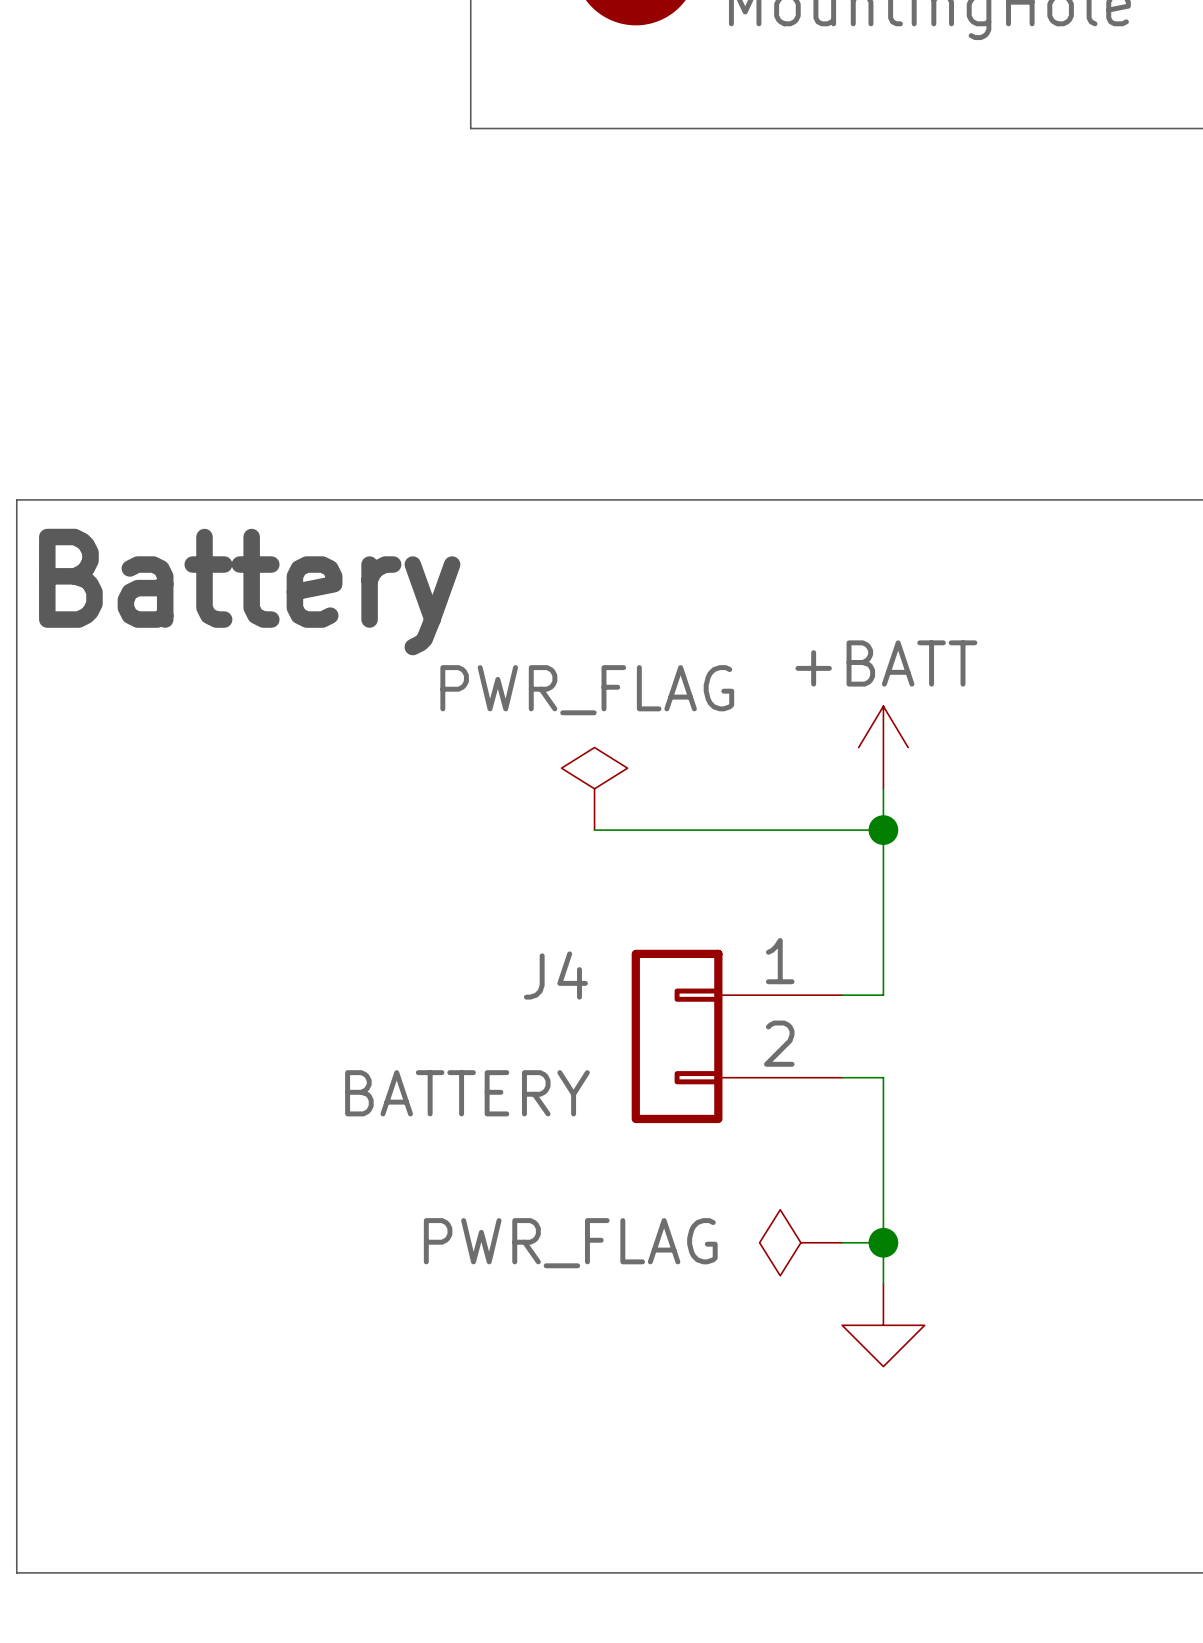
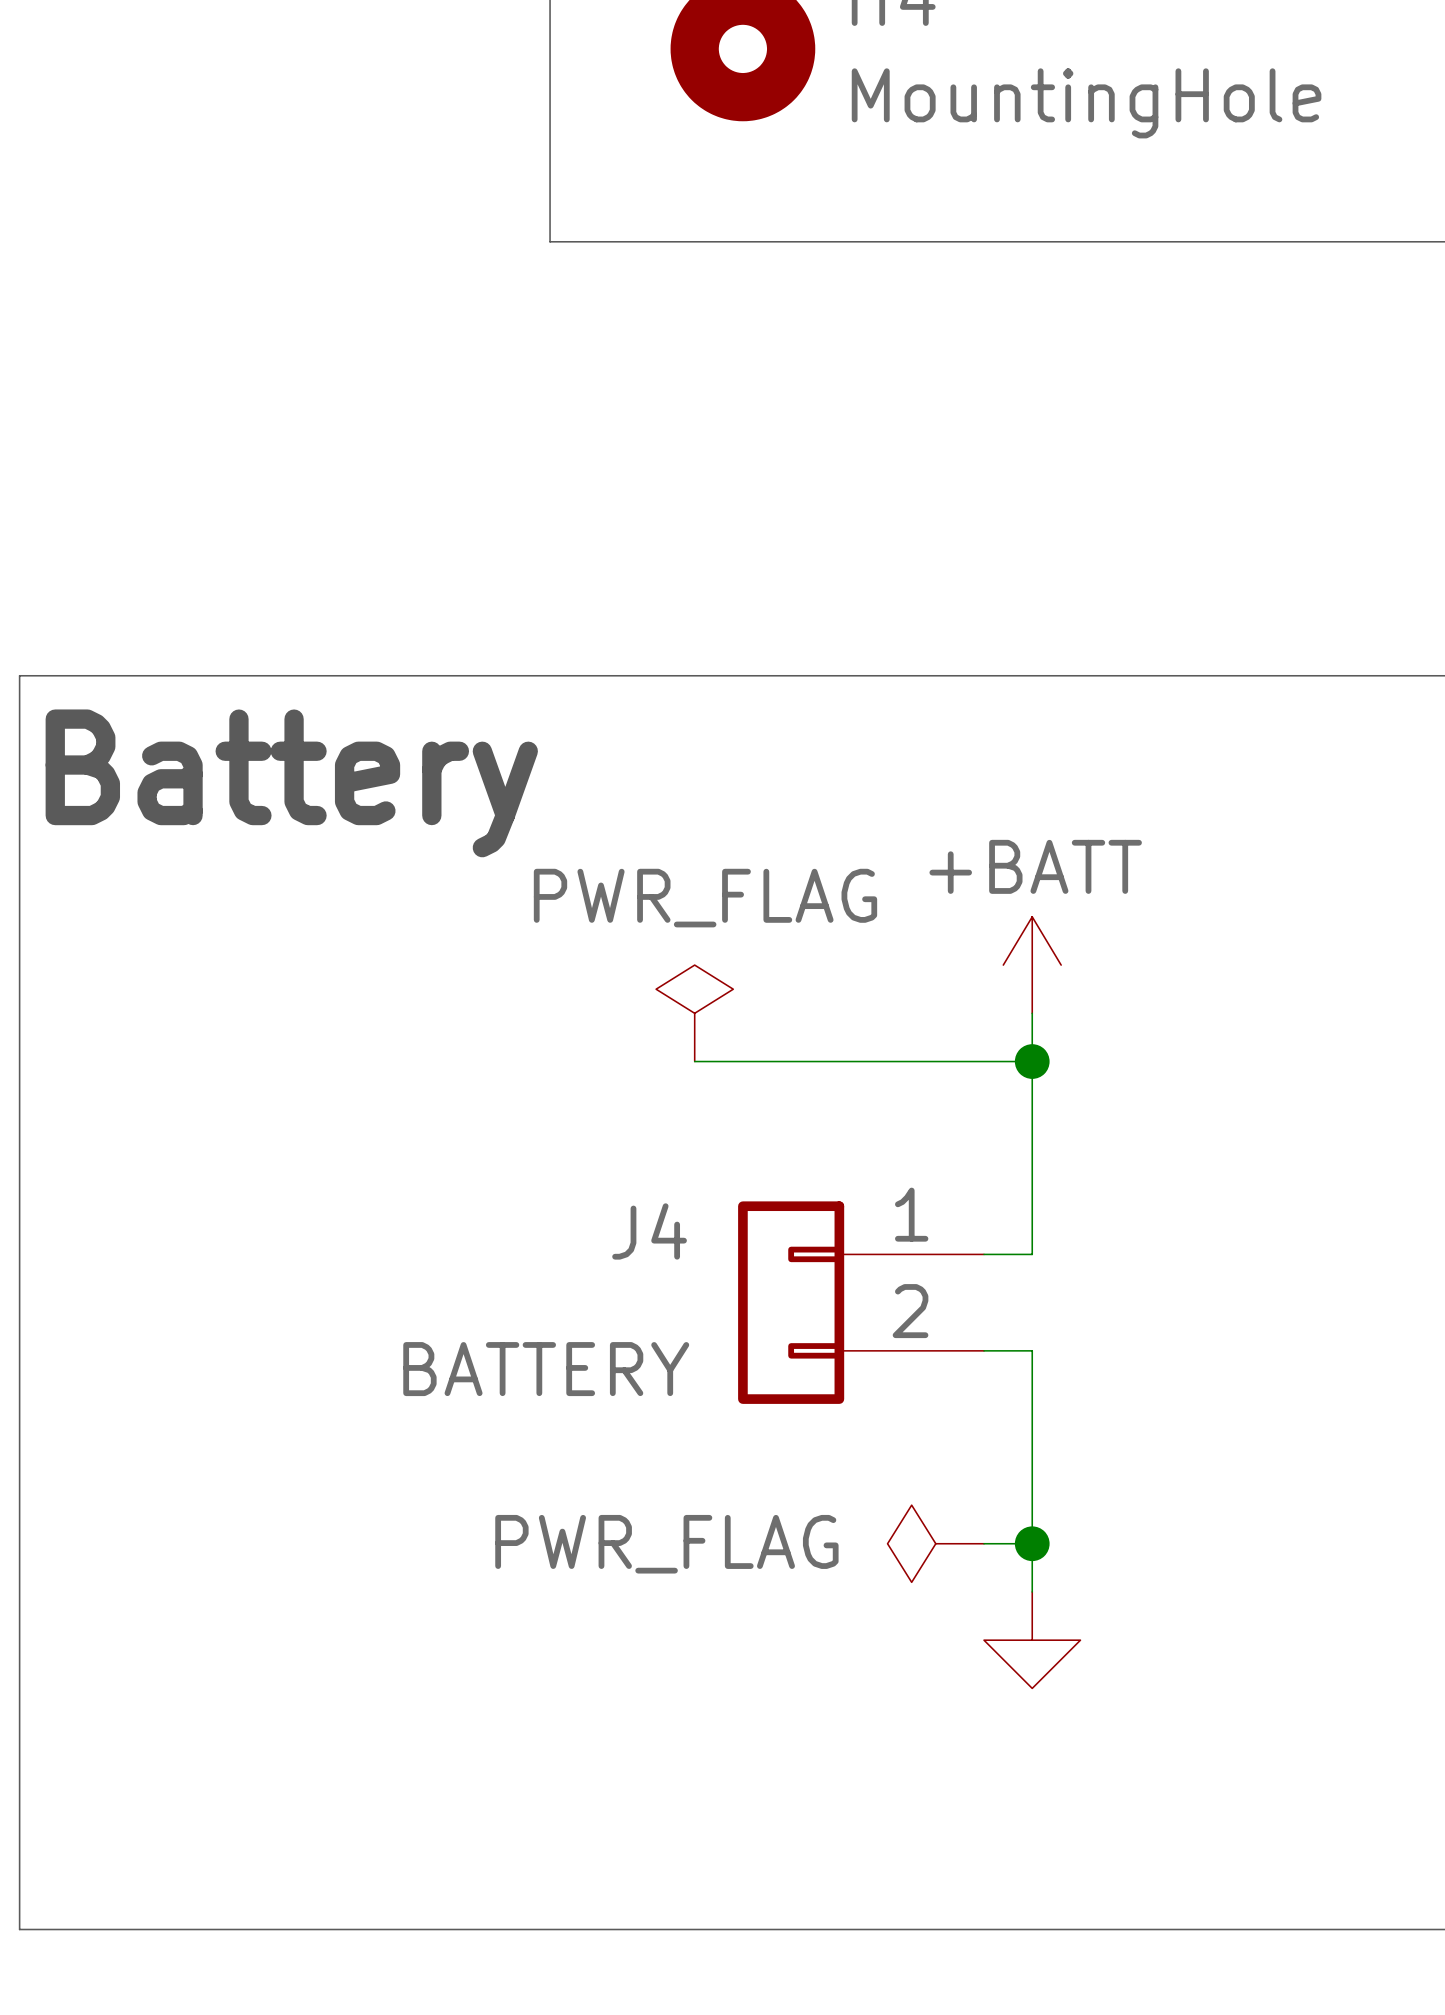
power symbol text position: PWR_FLAG (587, 690) -> PWR_FLAG (705, 898)

